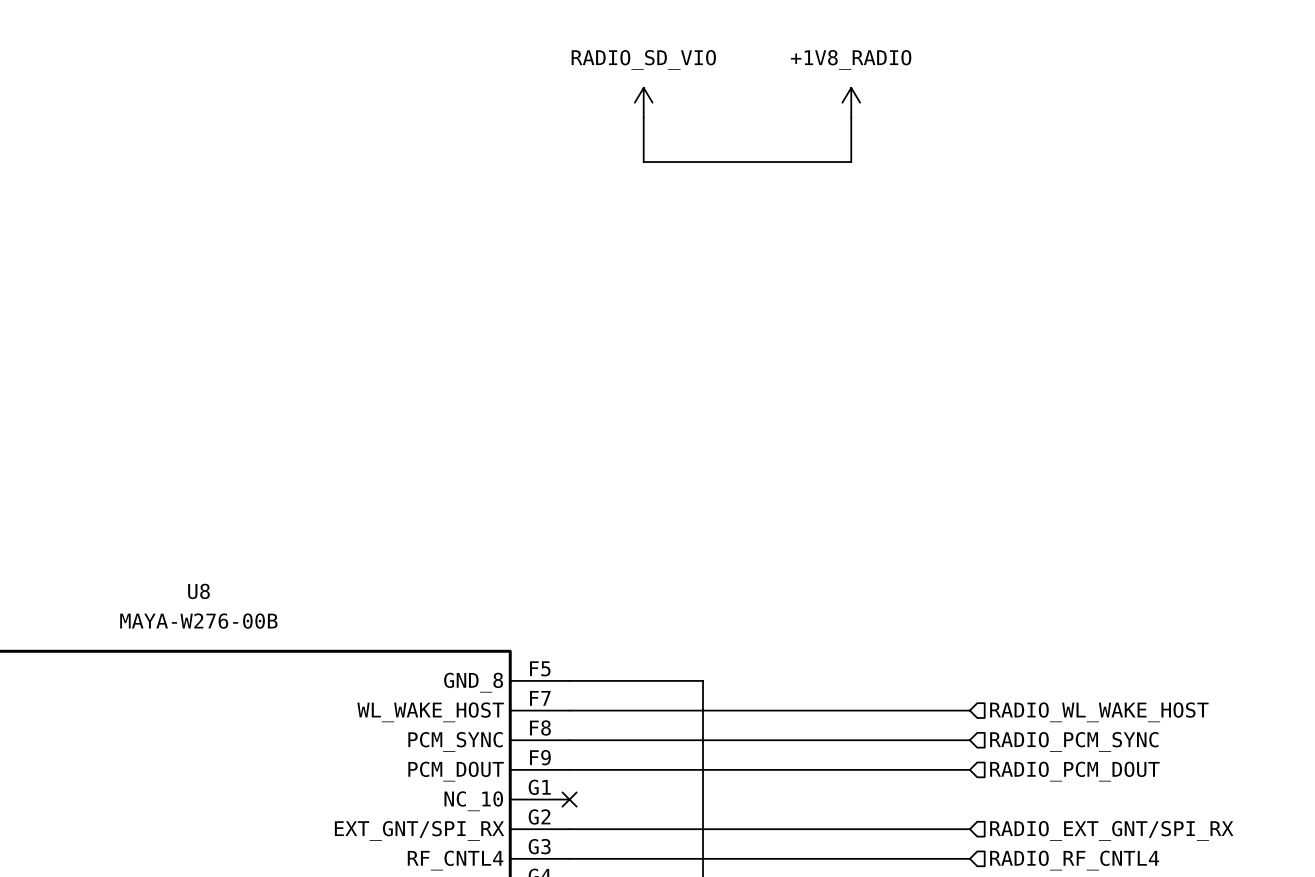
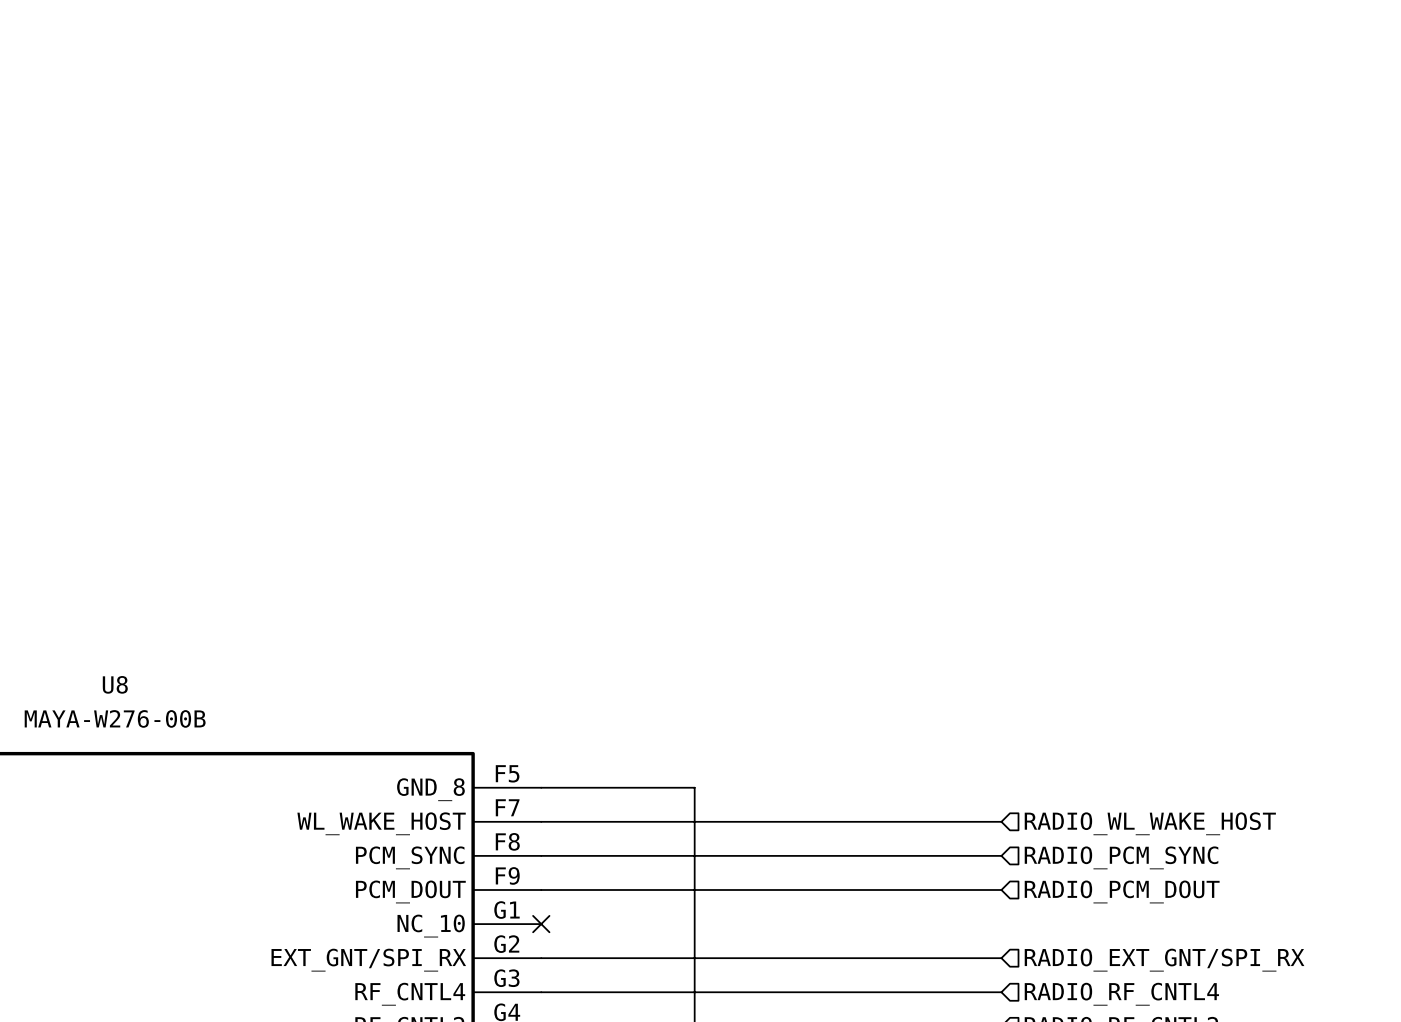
power symbol: RADIO_SD_VIO (643, 102) -> none
power symbol: +1V8_RADIO (851, 102) -> none
wire: (643, 117) (643, 162) (851, 162) (851, 117) -> none

